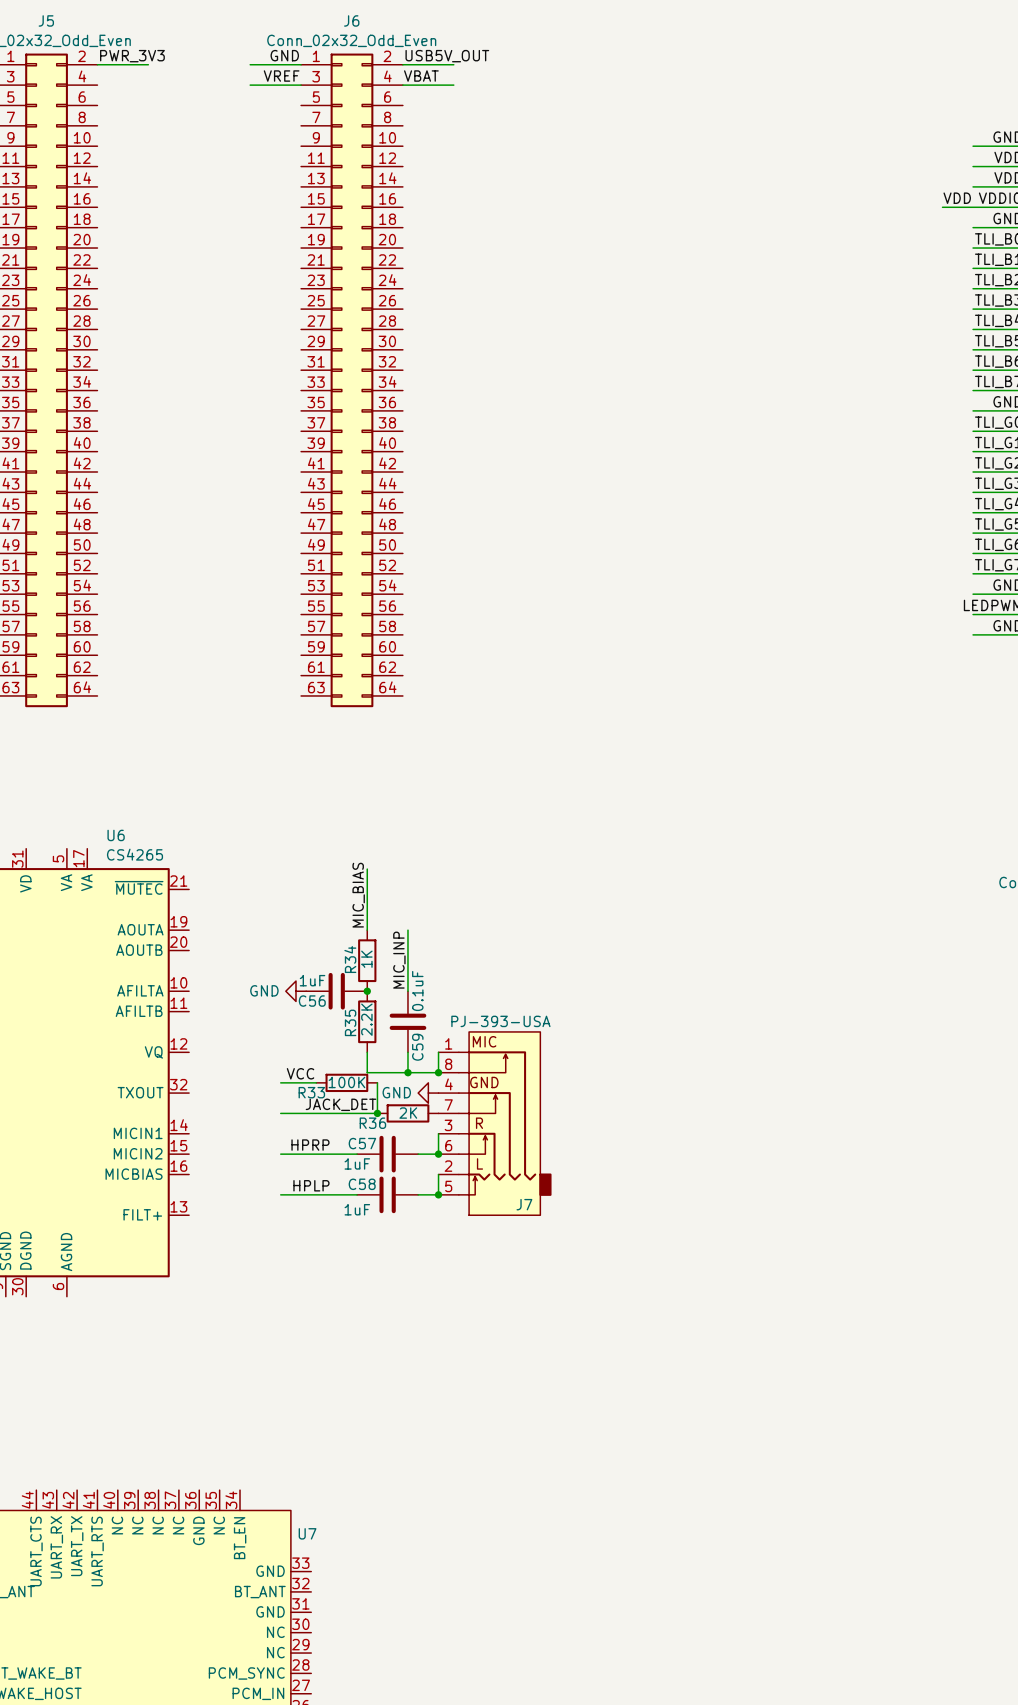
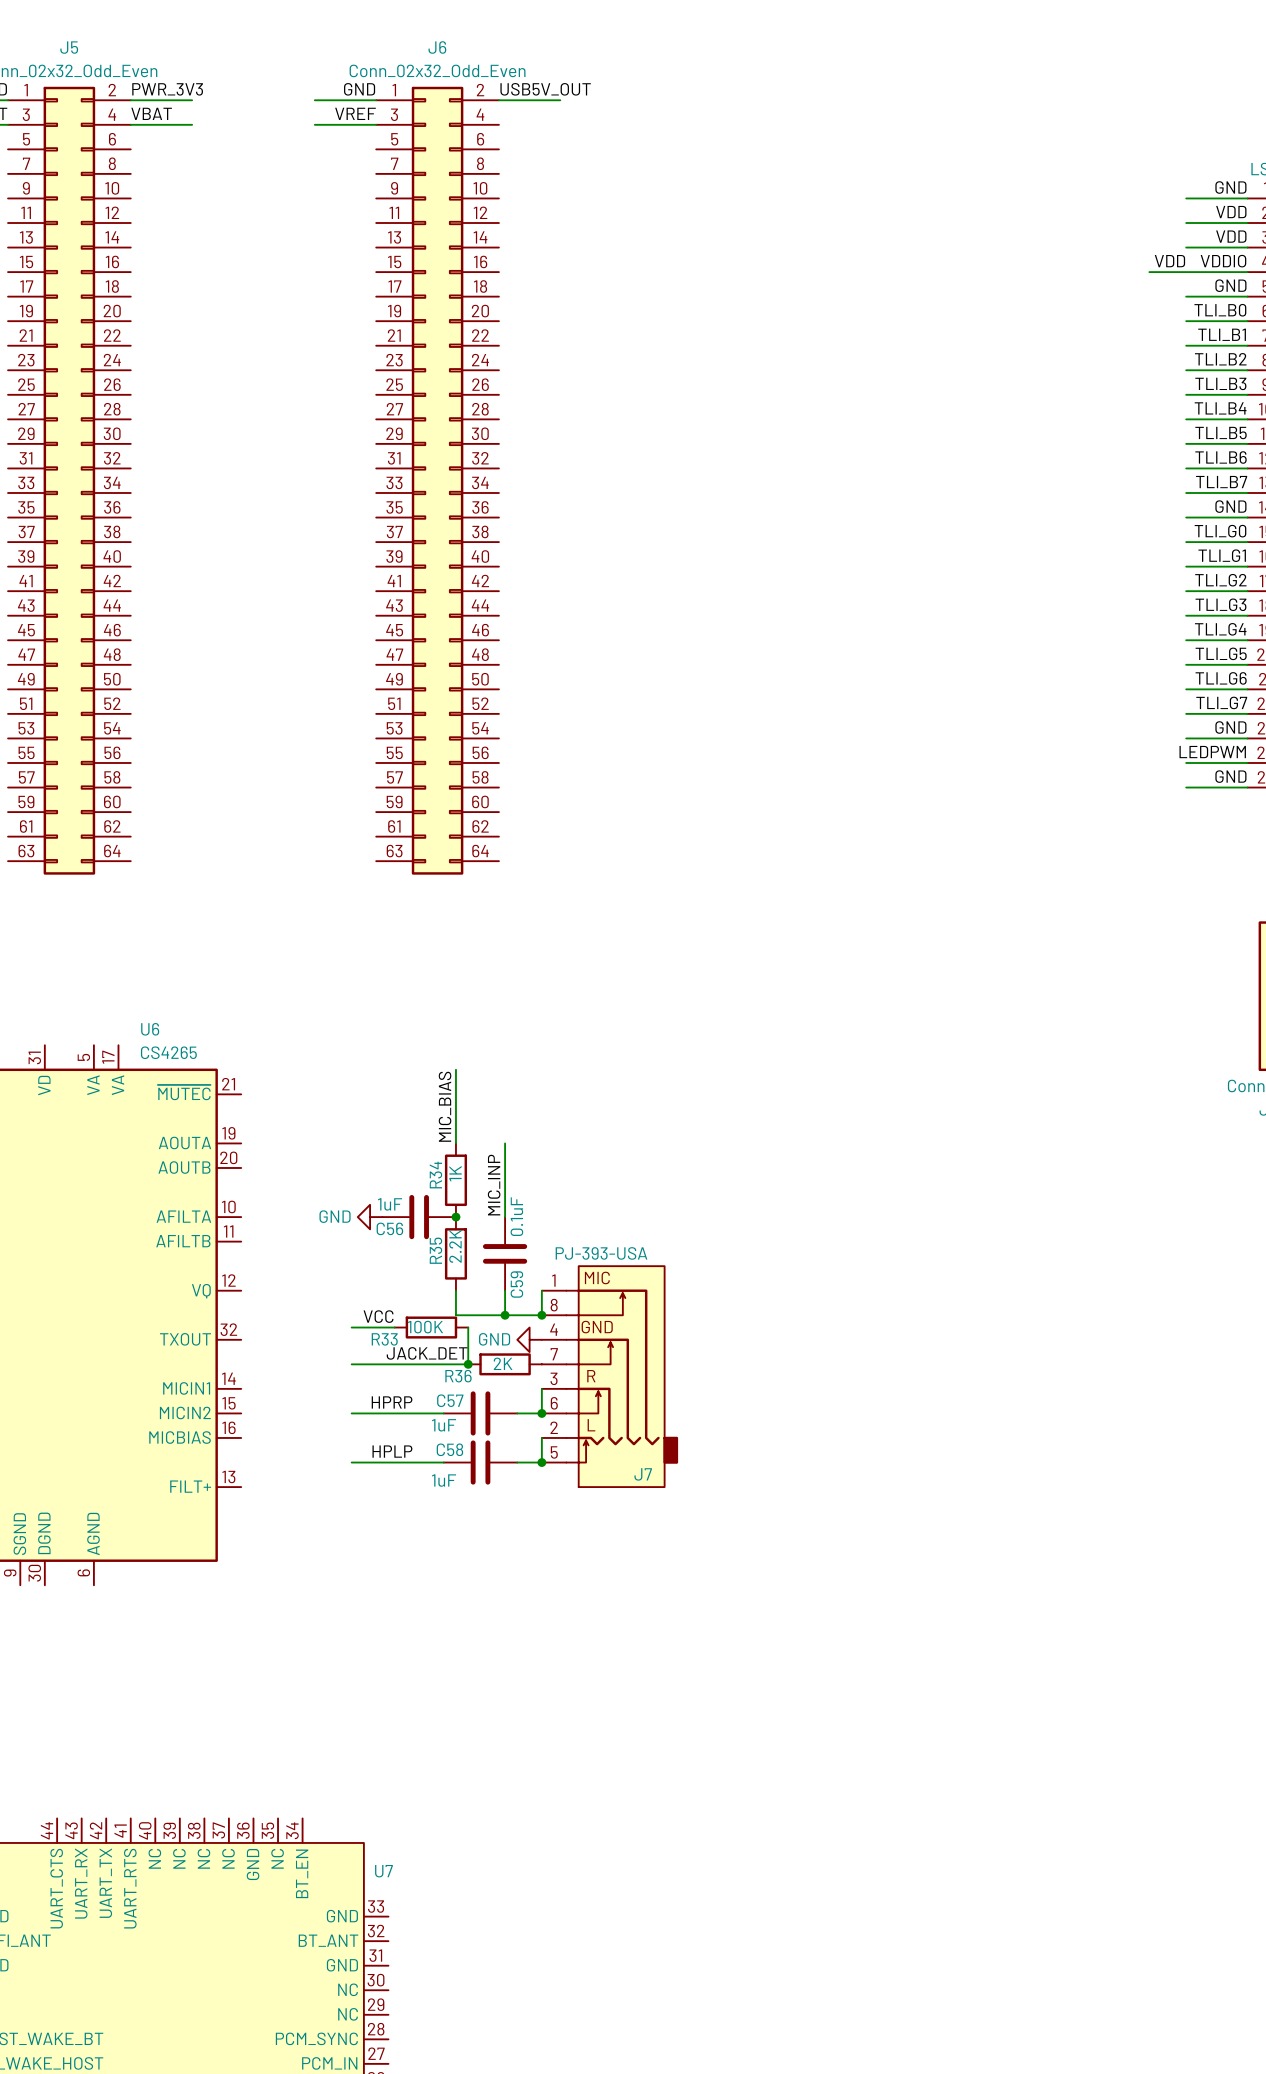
label: none -> VBAT (151, 113)
label: VBAT (421, 76) -> none
wire: none -> (130, 124) (192, 124)
wire: (402, 85) (453, 85) -> none

